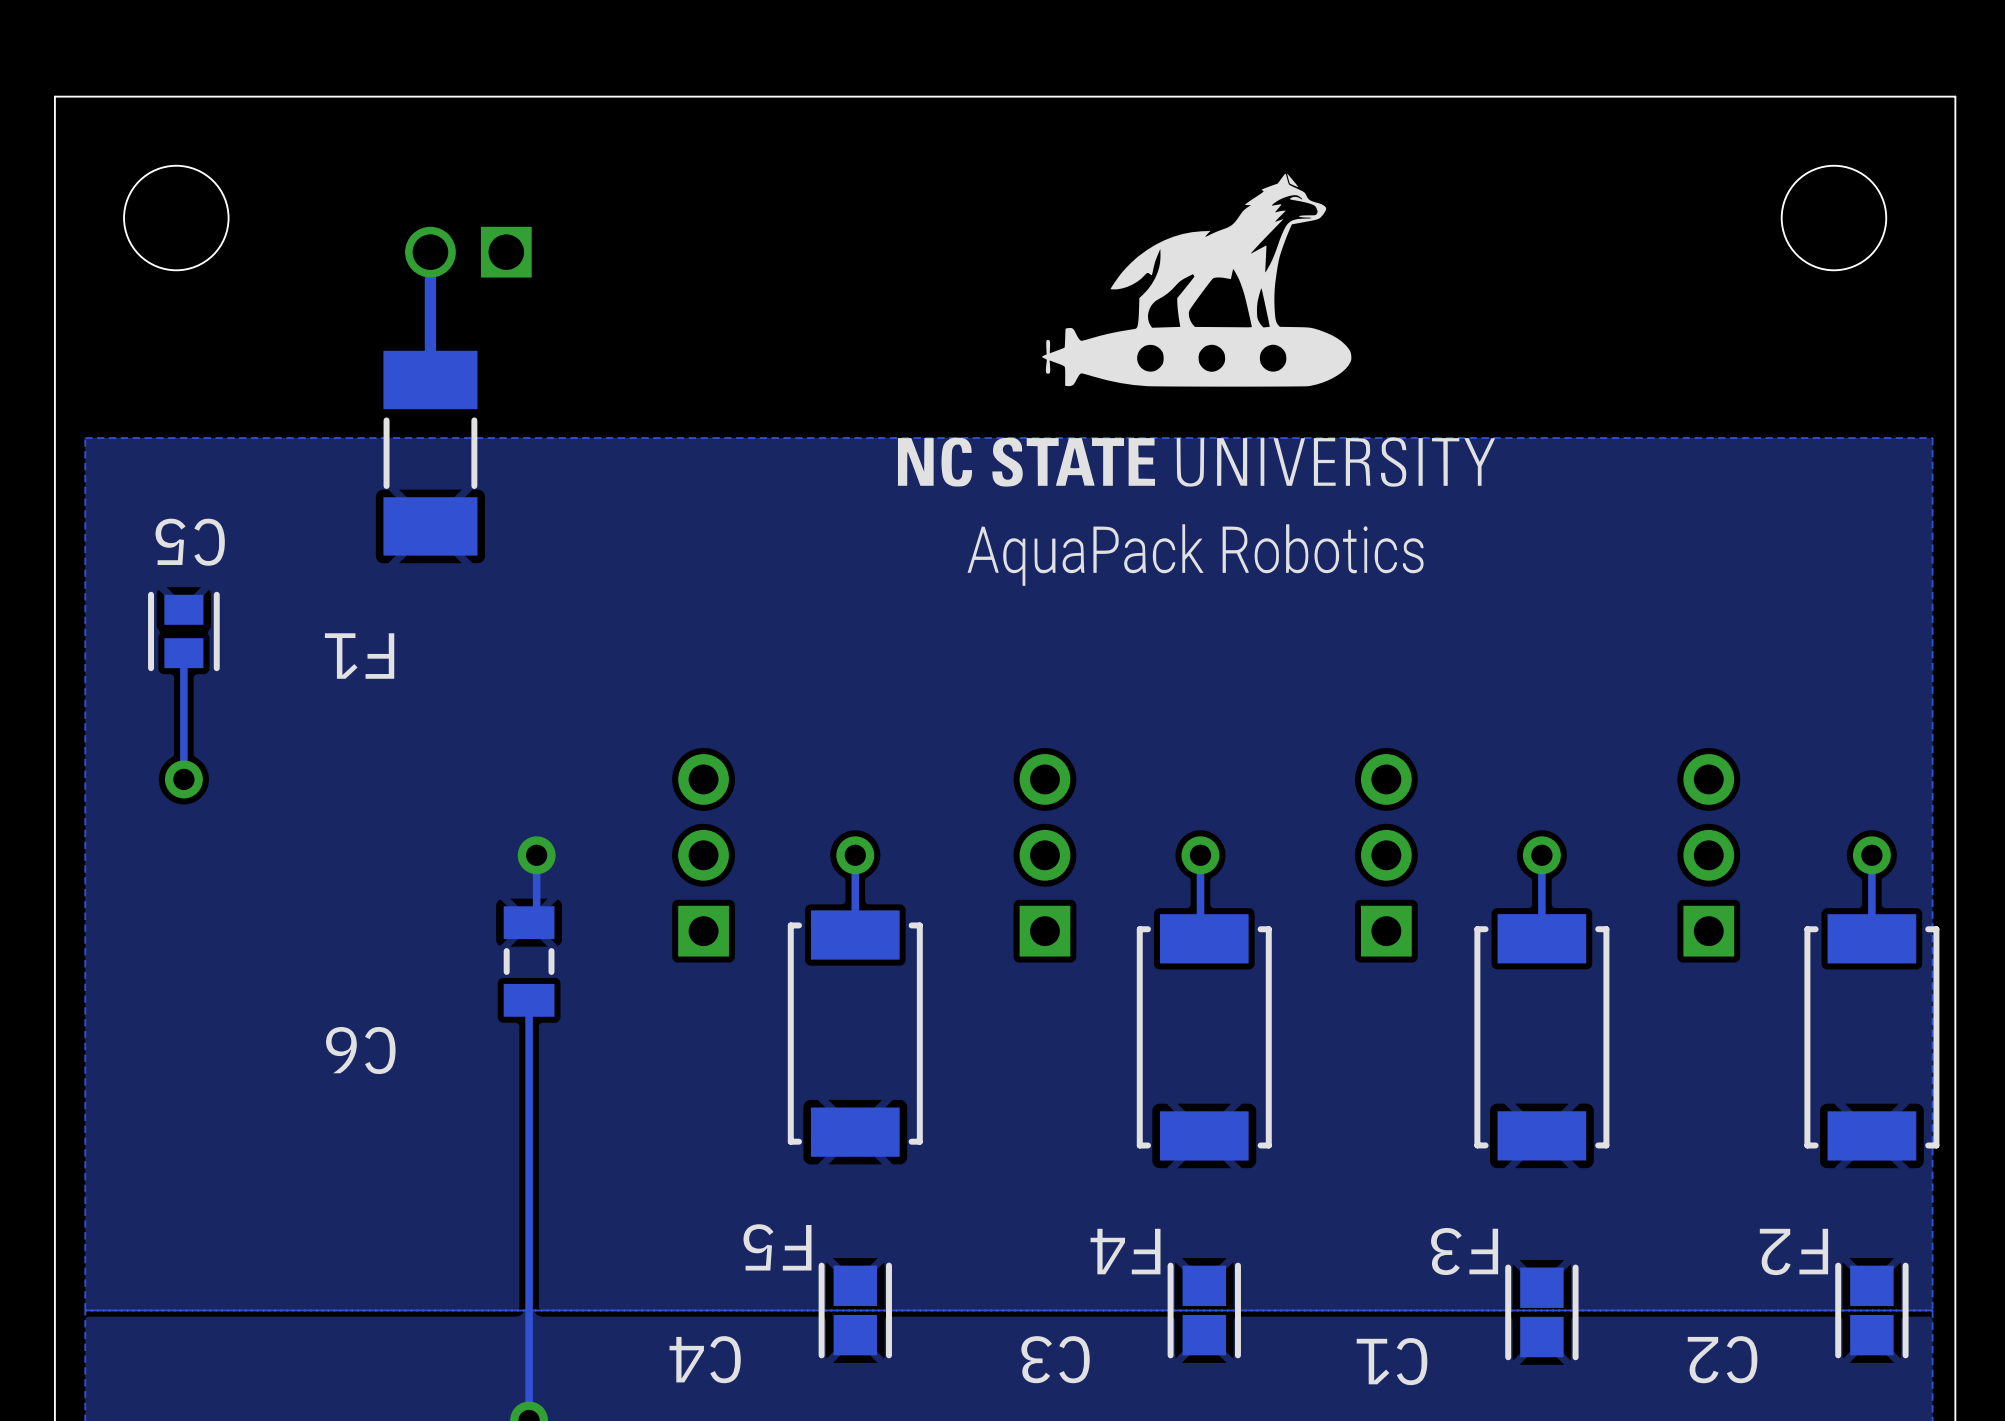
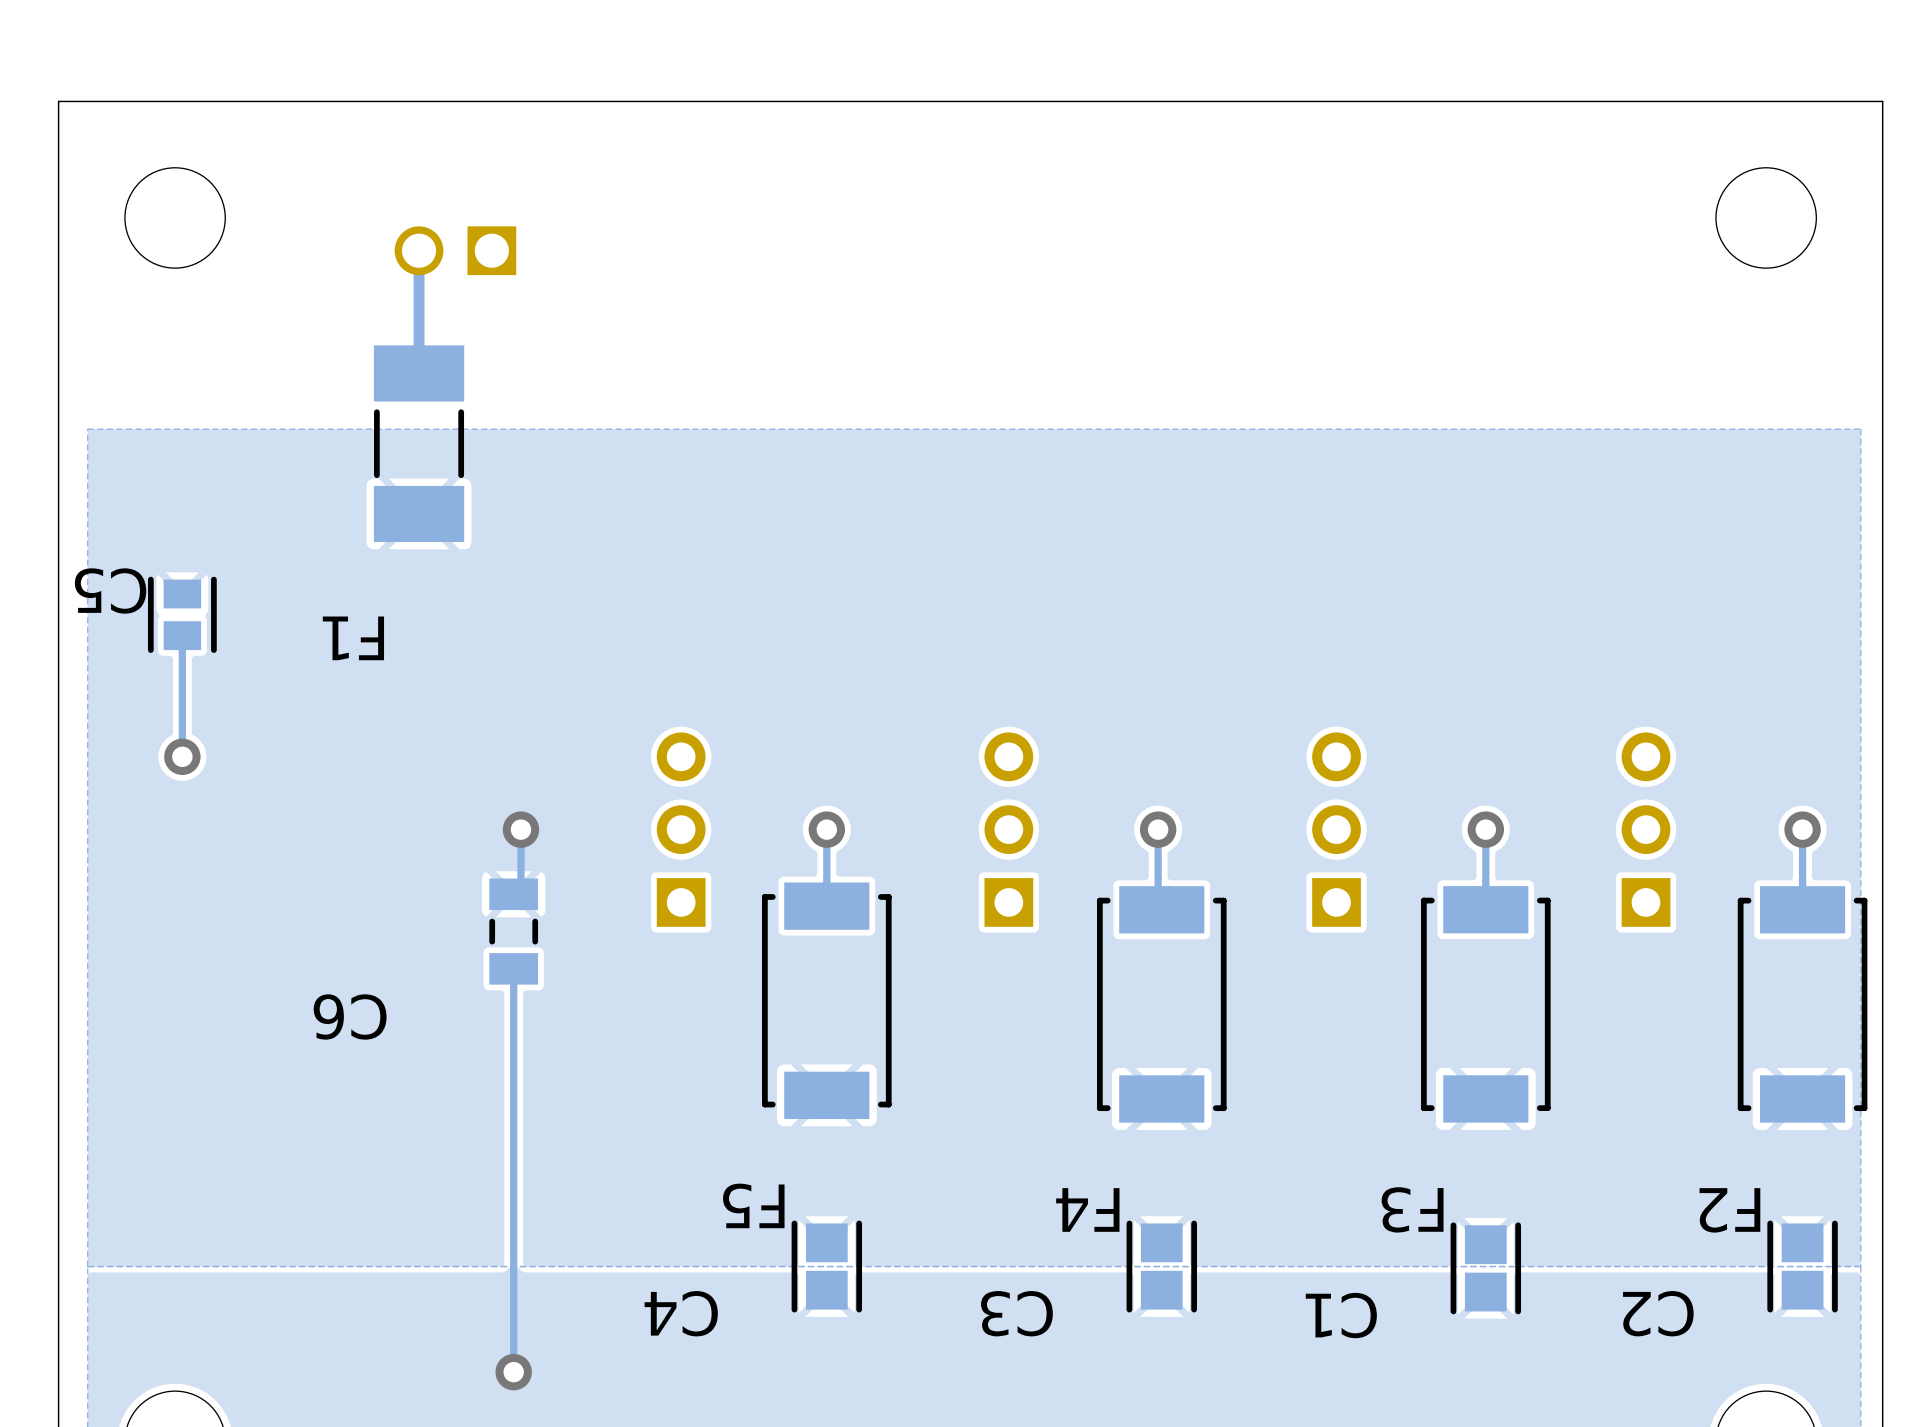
drawing: [897, 173, 1495, 586] -> none
C5 name position: C5 (190, 542) -> C5 (110, 591)

